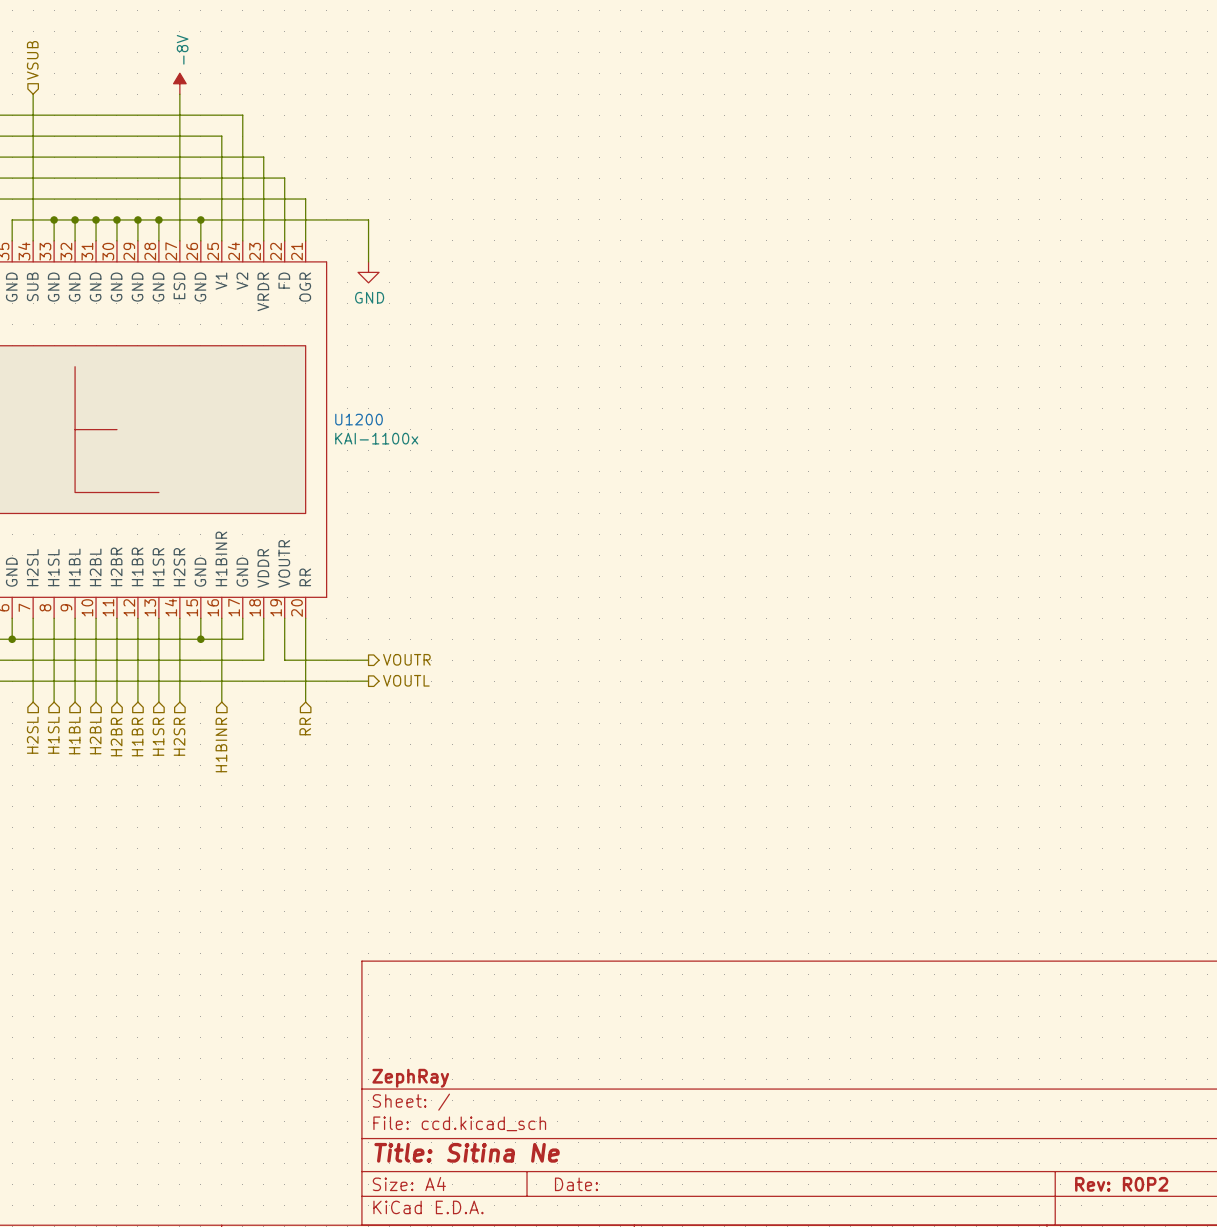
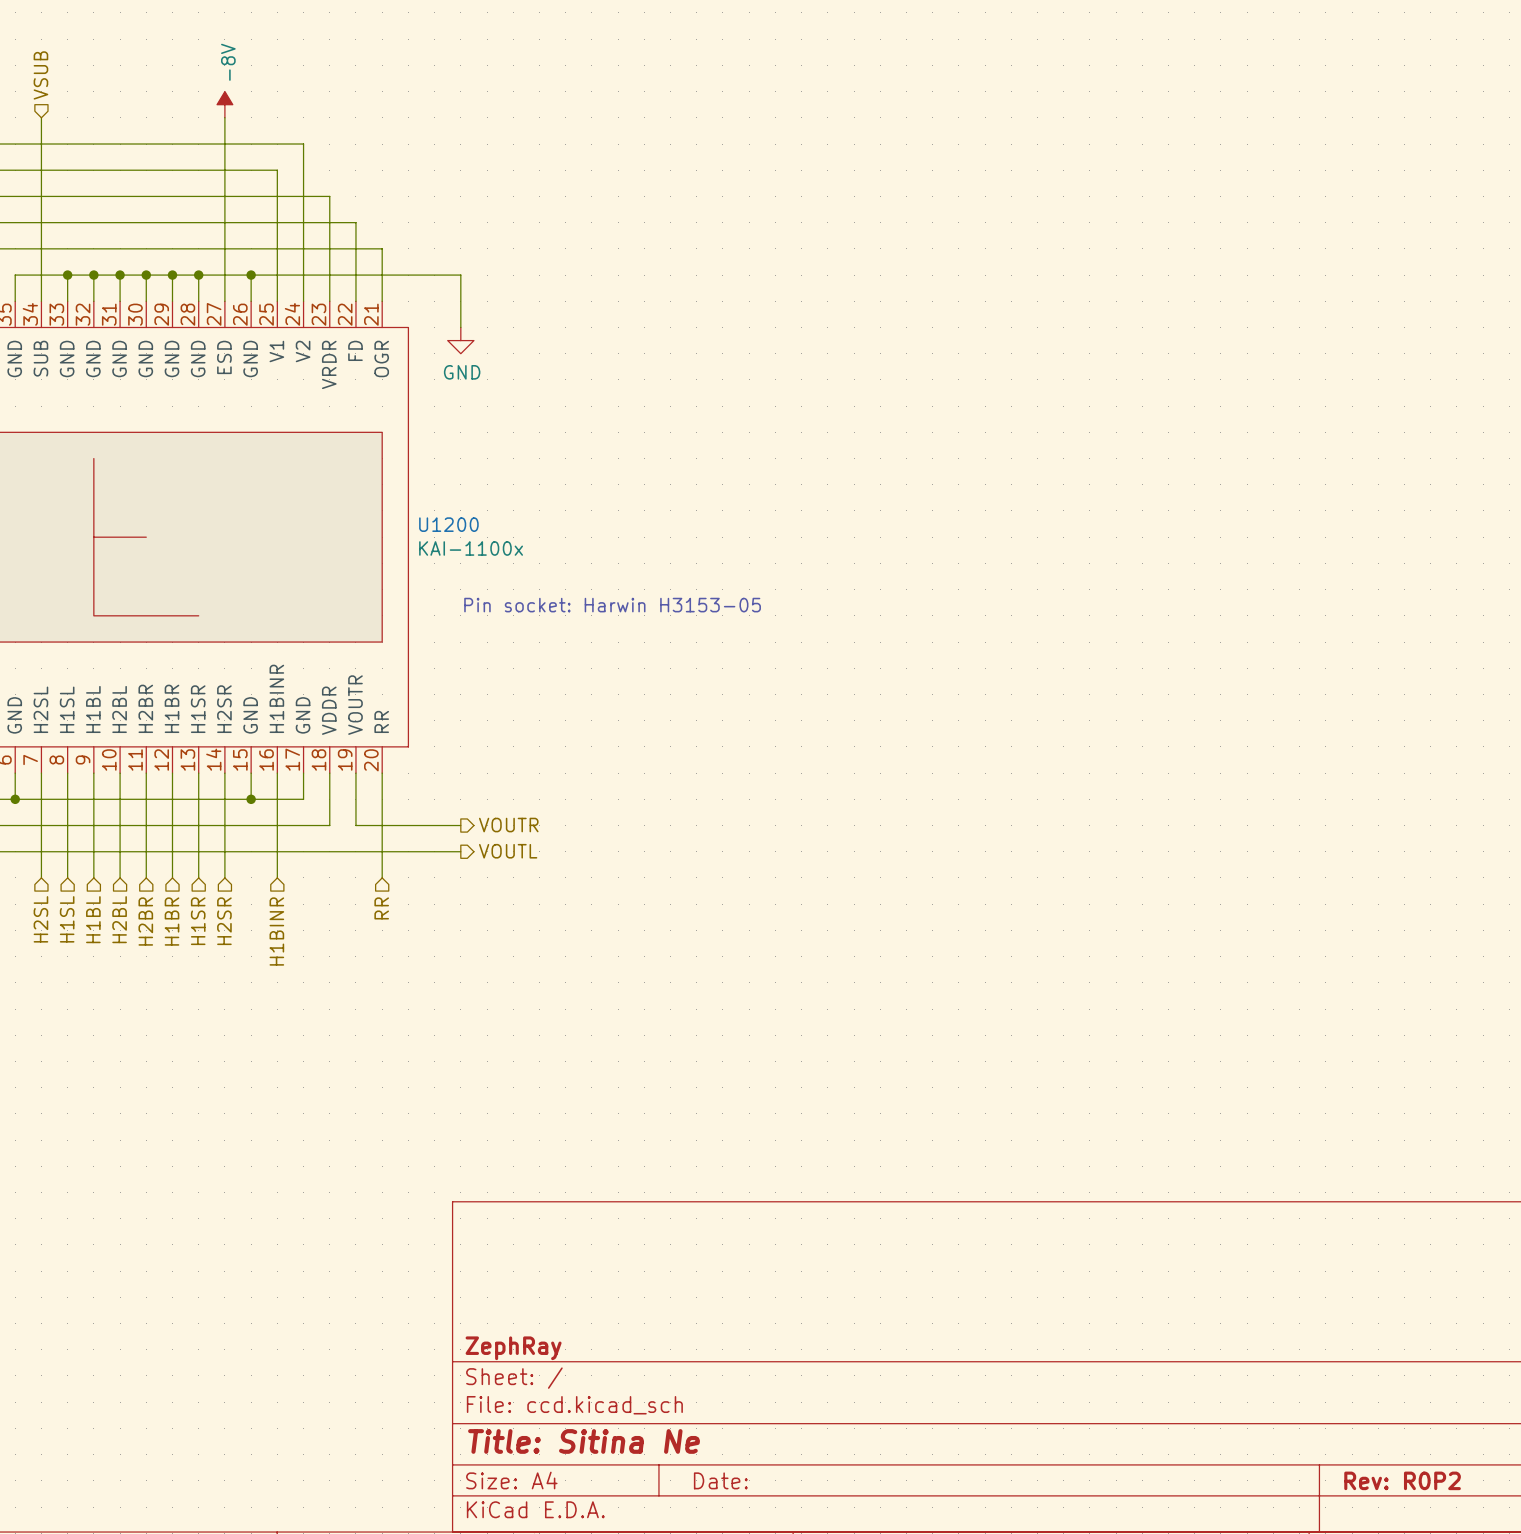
text: none -> Pin socket: Harwin H3153-05 (612, 605)

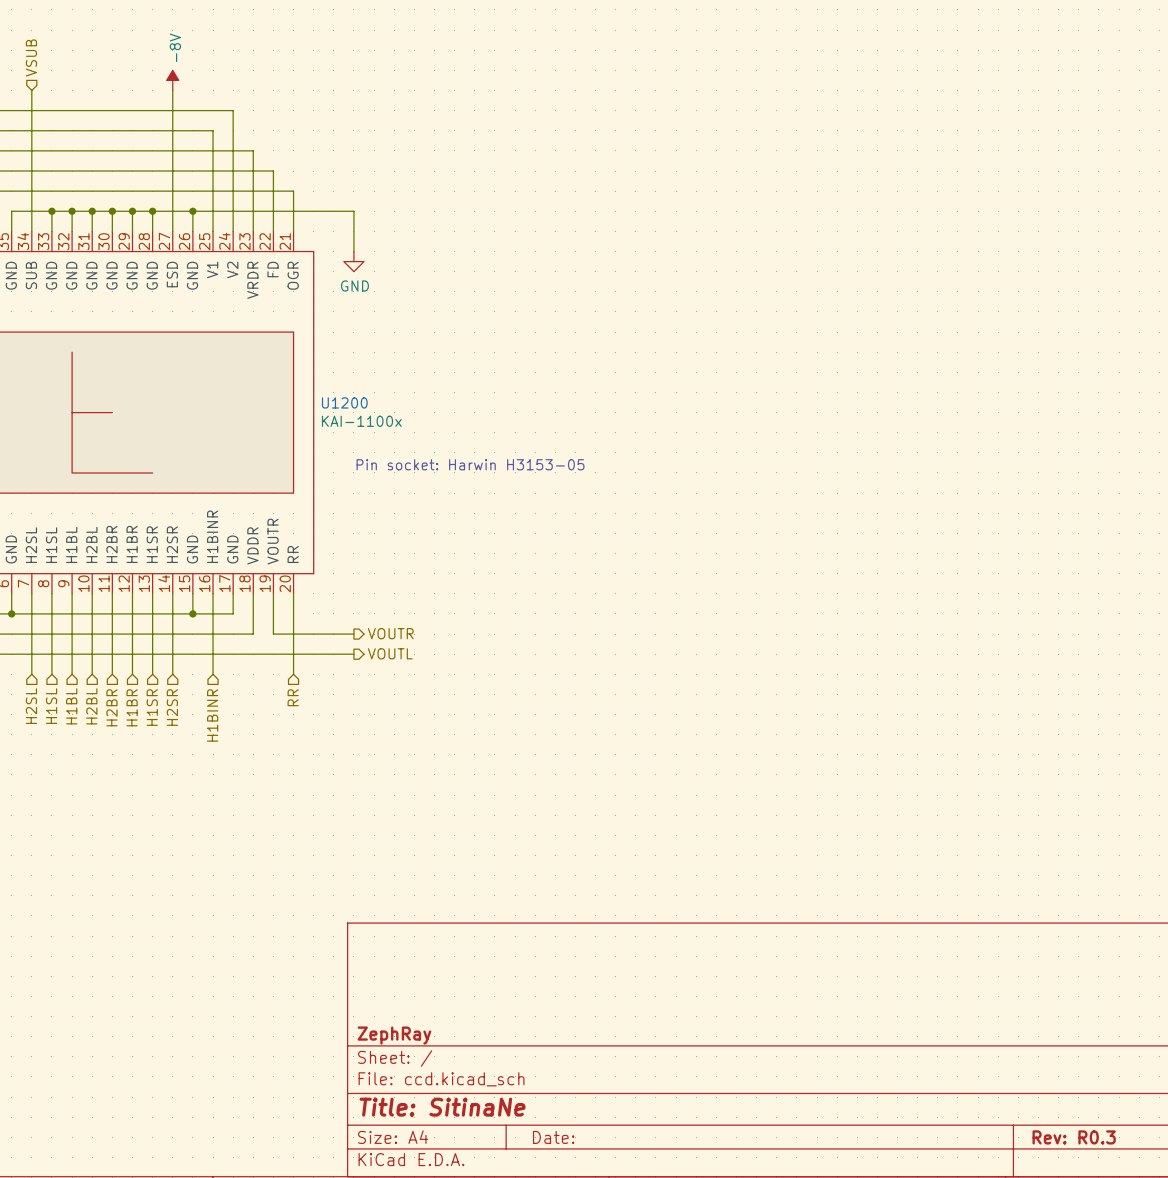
title block: Title: Sitina Ne (584, 1441) -> Title: SitinaNe (442, 1107)
title block: Rev: R0P2 (1402, 1480) -> Rev: R0.3 (1074, 1137)

